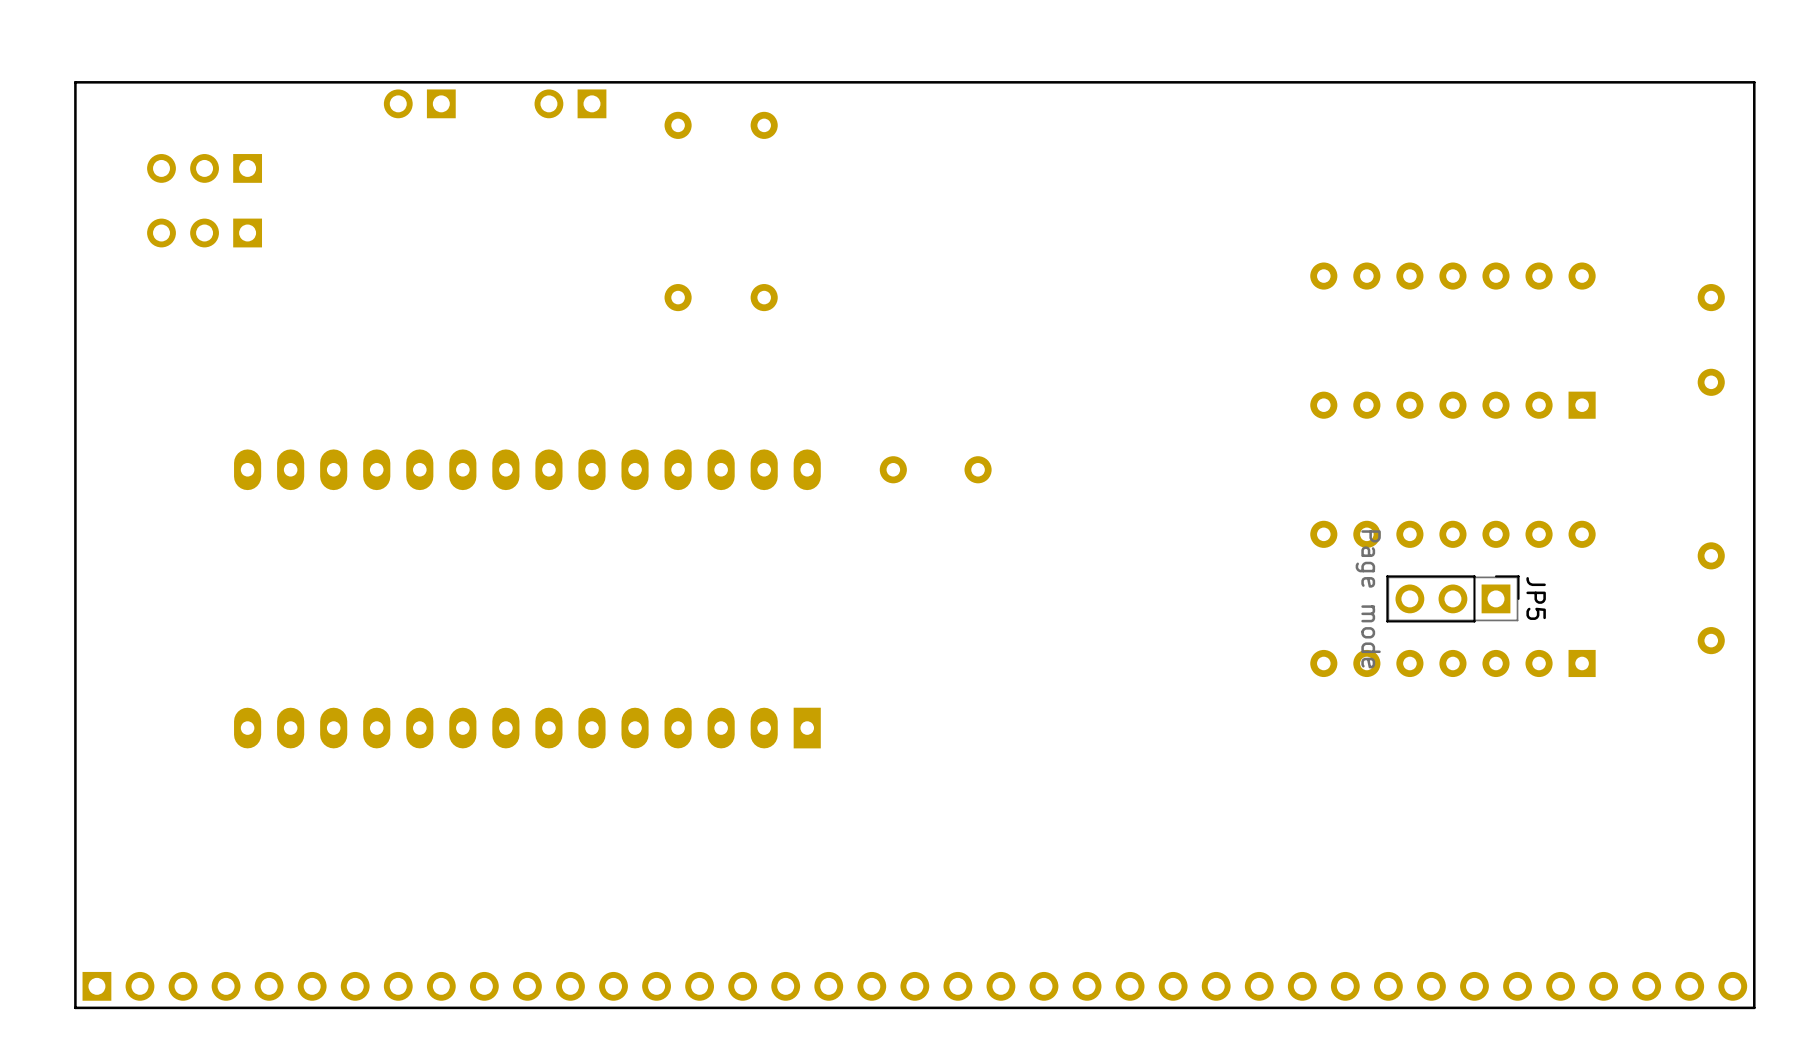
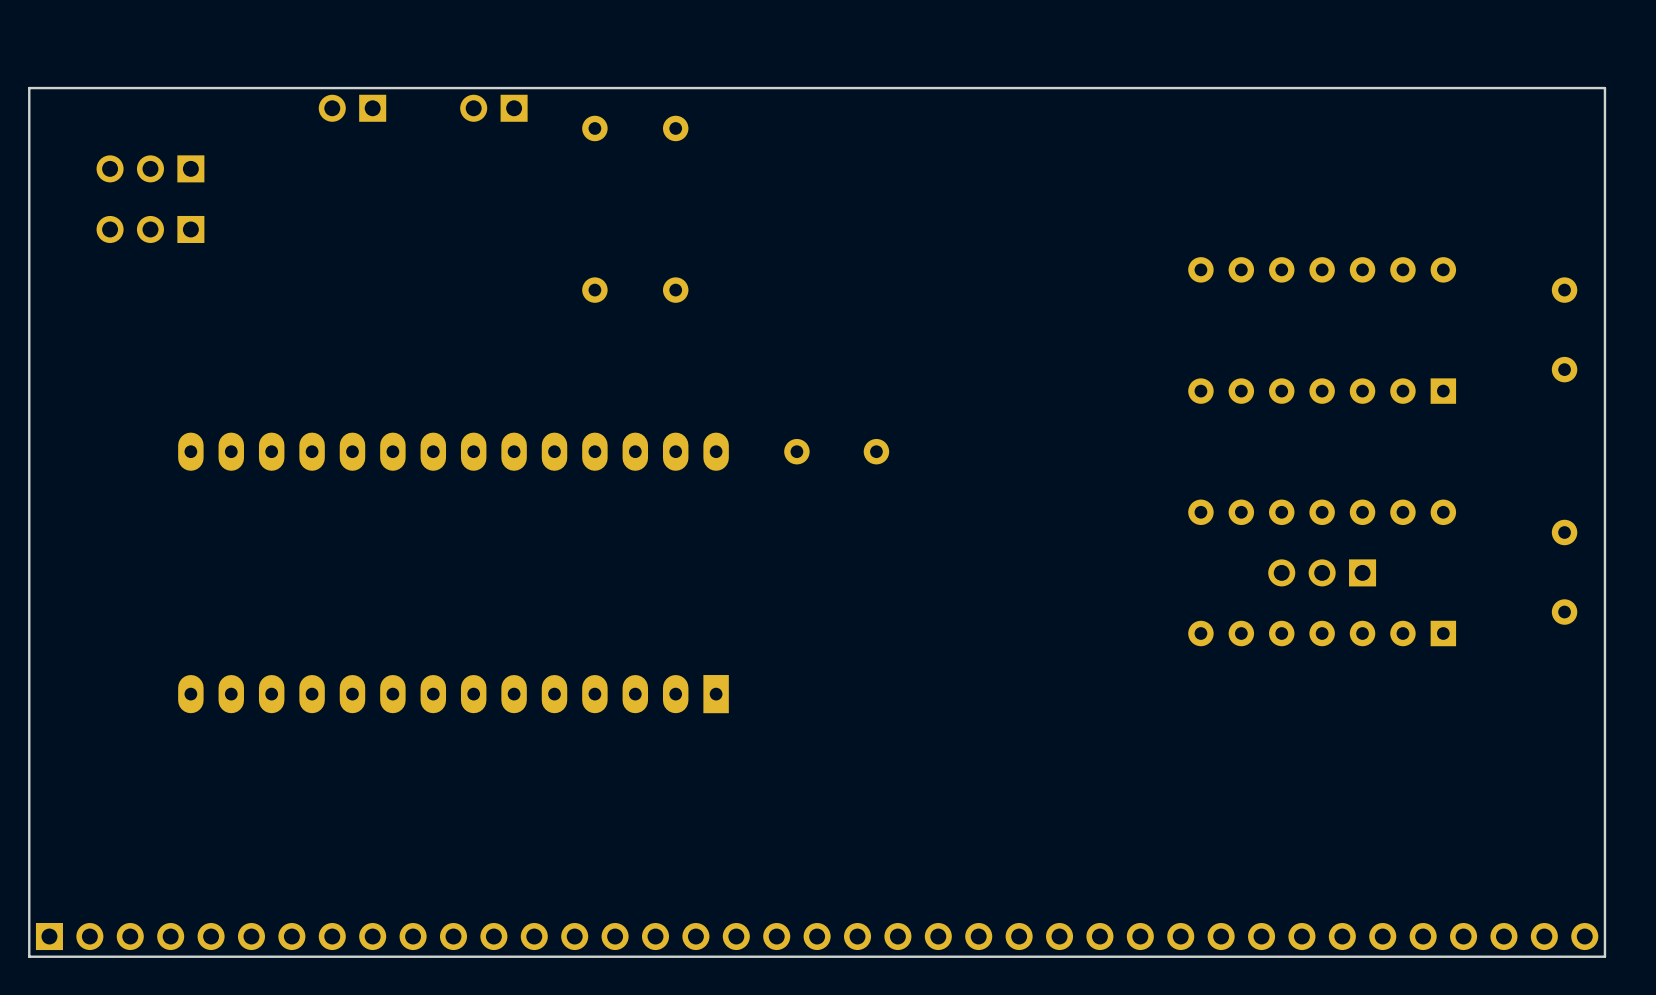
JP5 side: bottom (1452, 598) -> top (1322, 572)

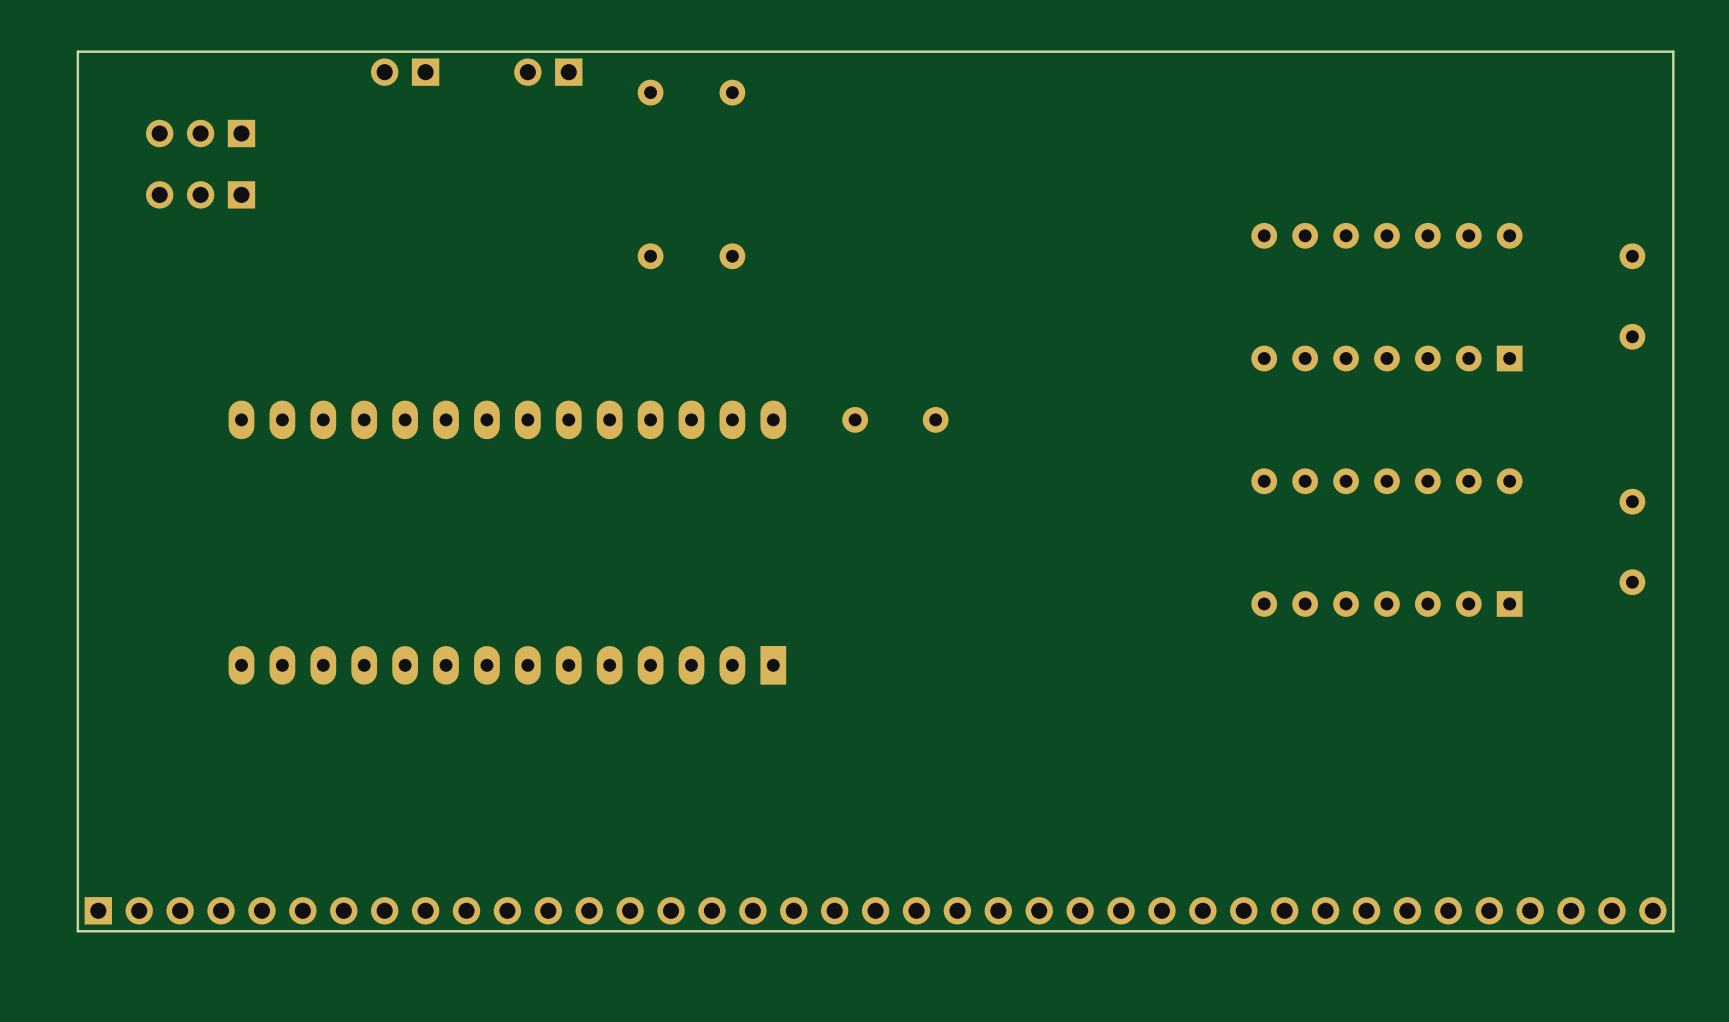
part: (1322, 572) -> none

